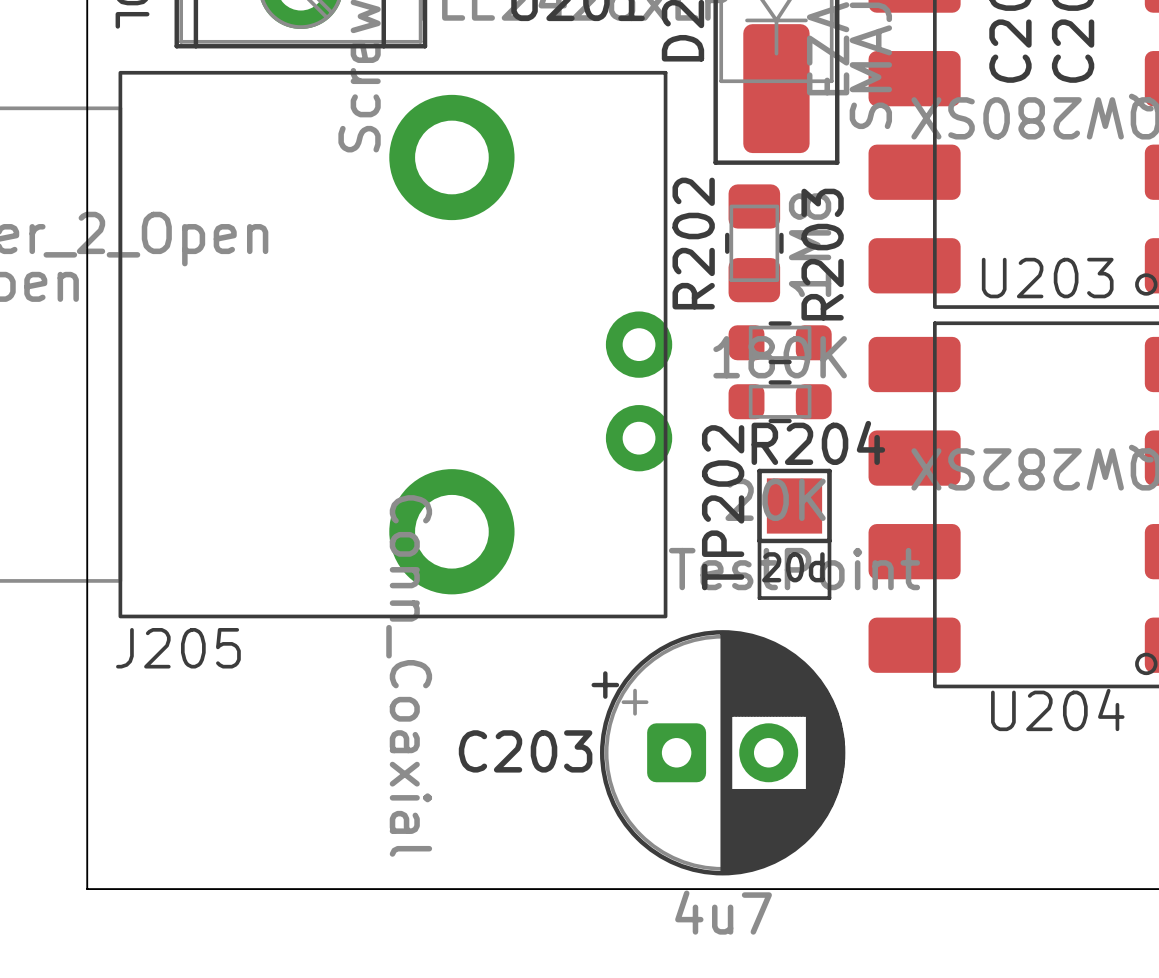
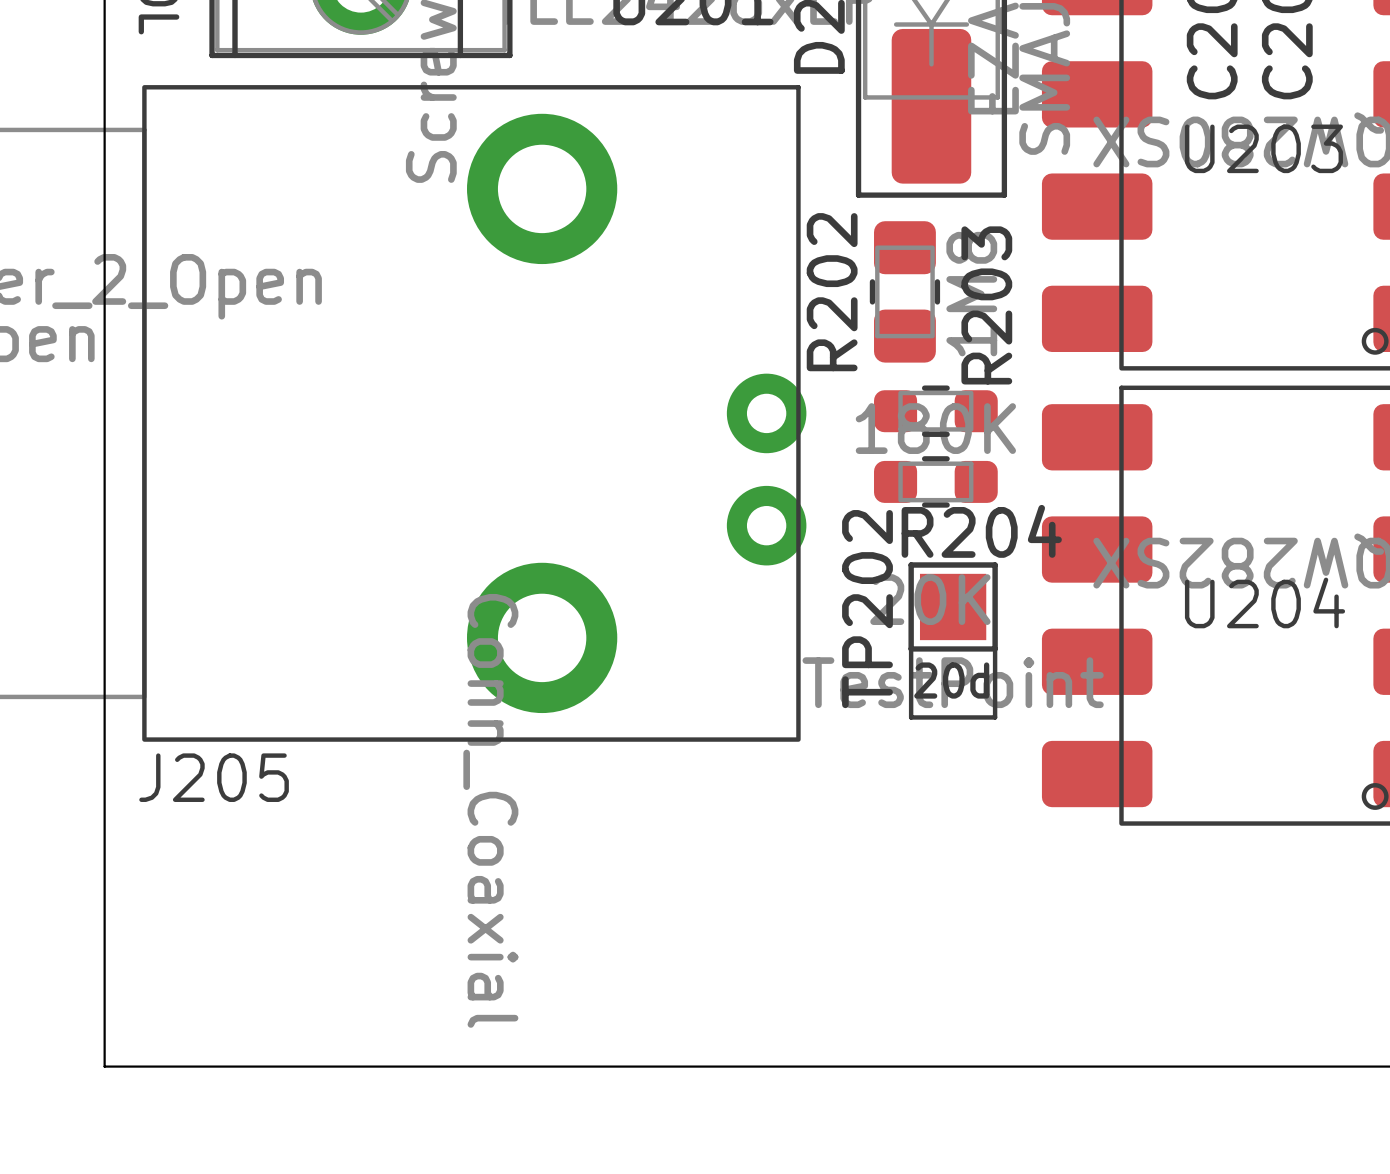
U203 name position: U203 (1047, 278) -> U203 (1263, 148)
U204 name position: U204 (1057, 710) -> U204 (1265, 602)
C203: 4u7 (718, 752) -> none

